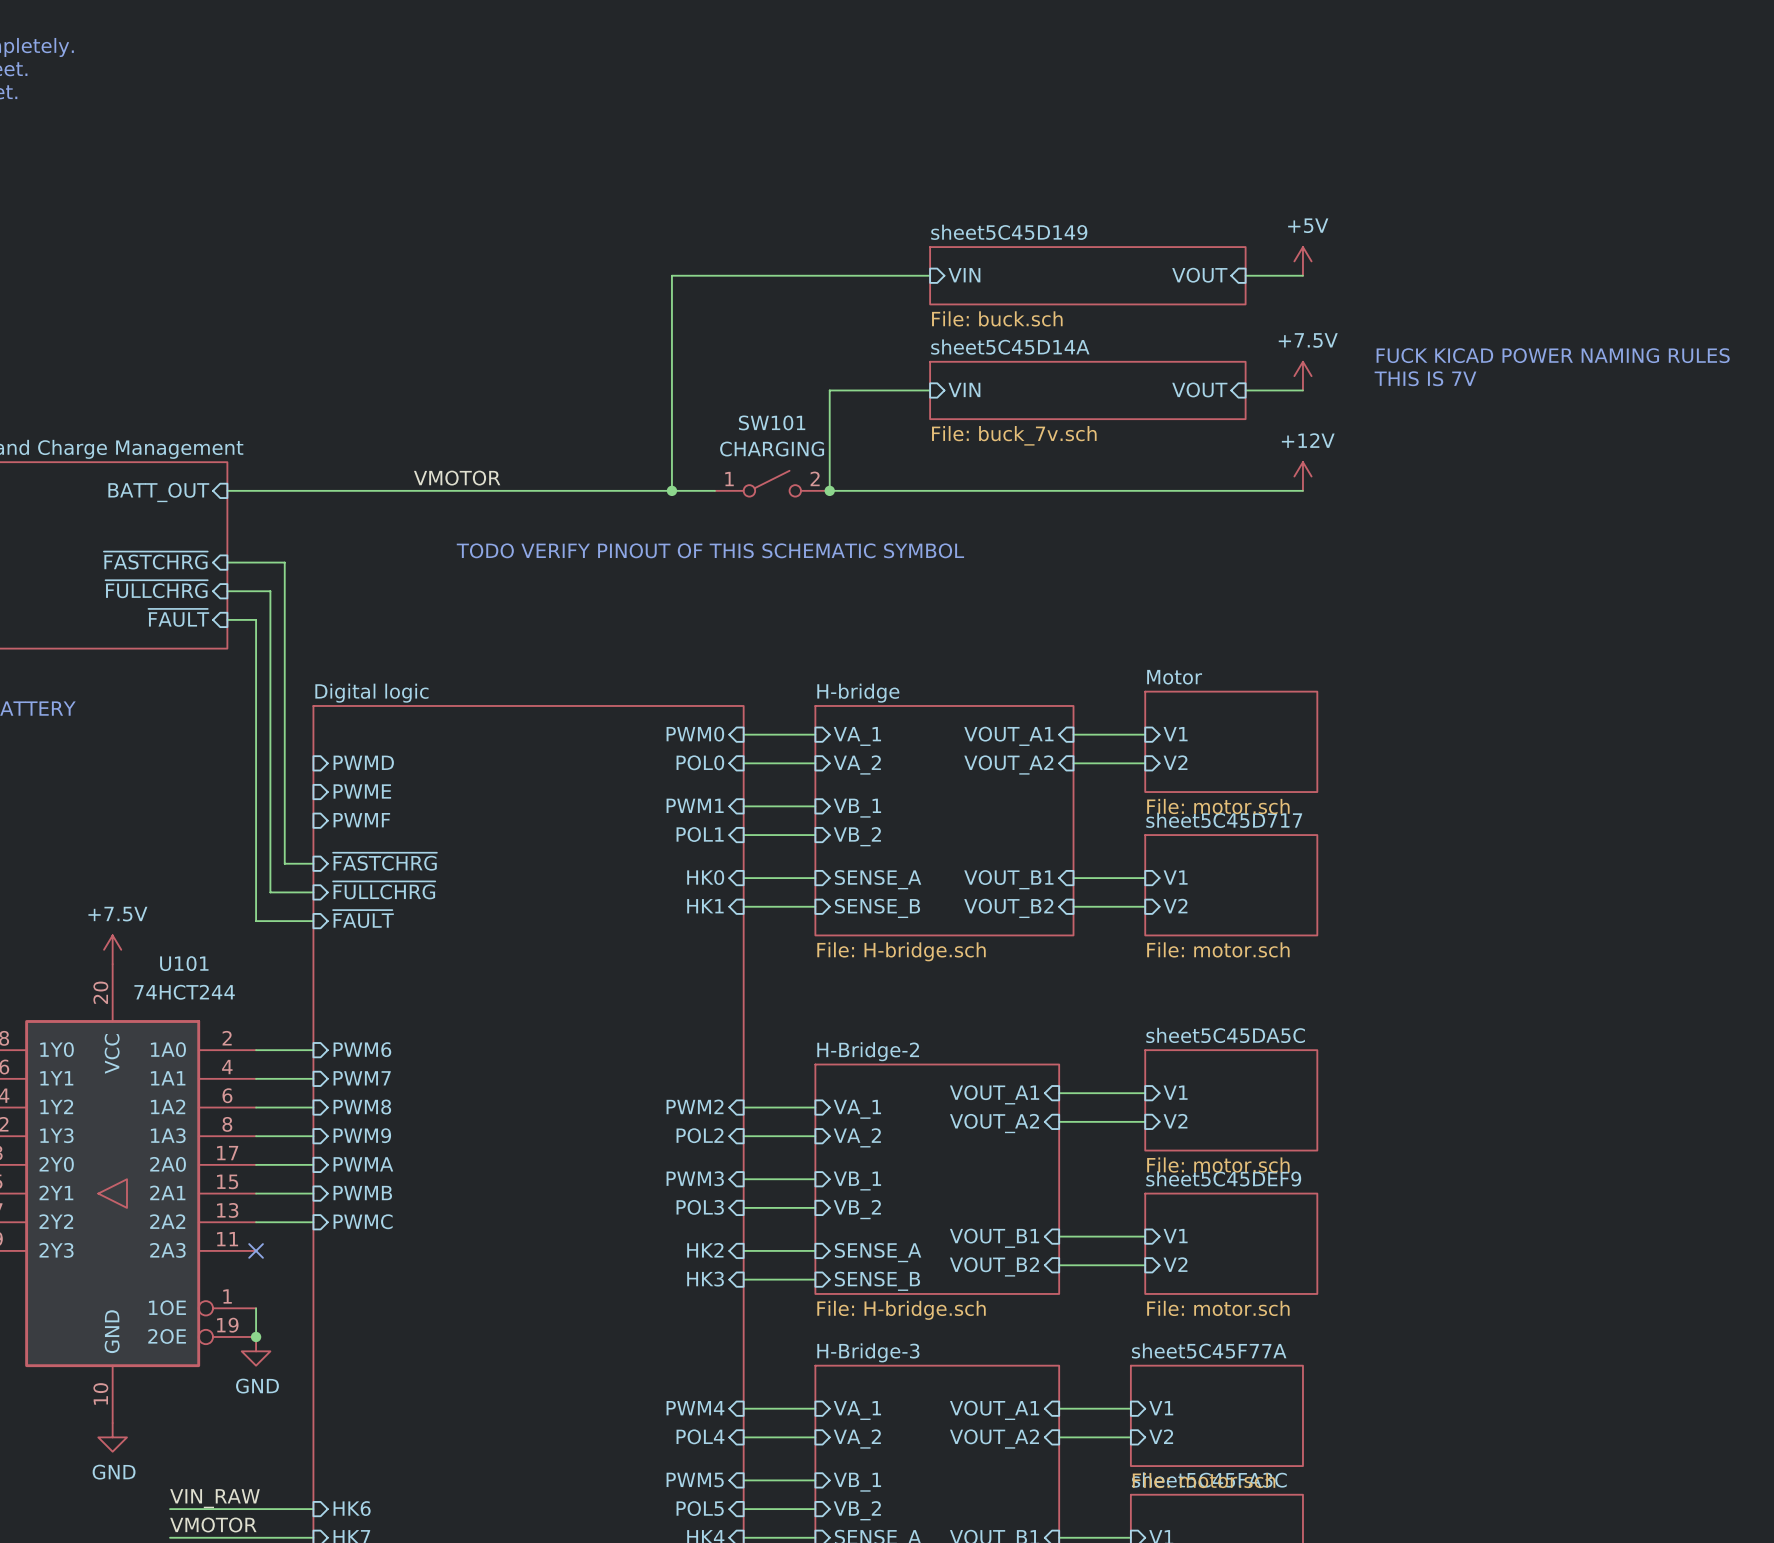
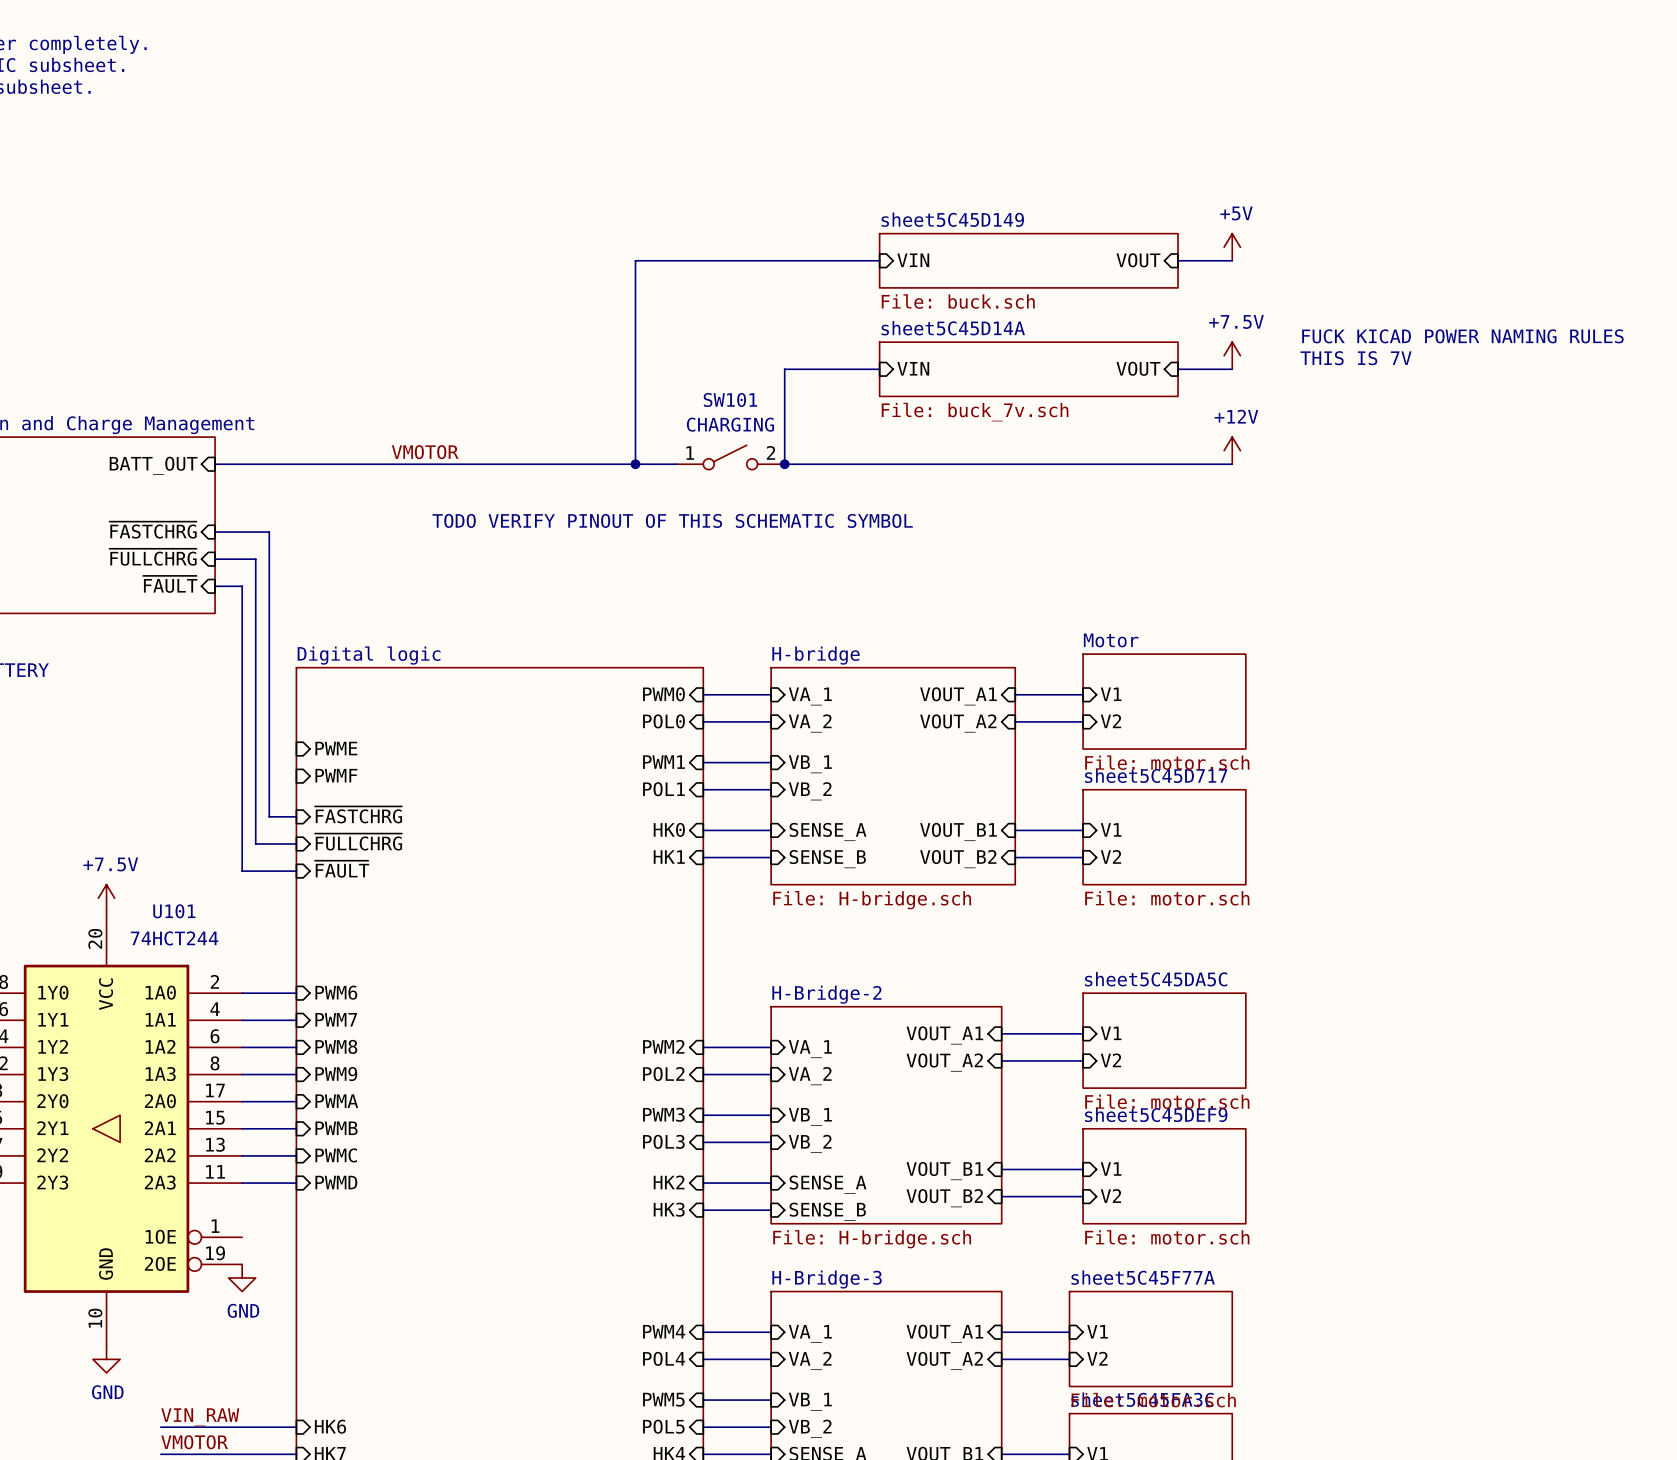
sheet pin: PWMD (363, 762) -> none
wire: none -> (242, 1183) (296, 1183)
no-connect mark: (256, 1250) -> none
sheet pin: none -> PWMD (336, 1182)
wire: (256, 1308) (256, 1336) -> none
junction: (256, 1336) -> none

